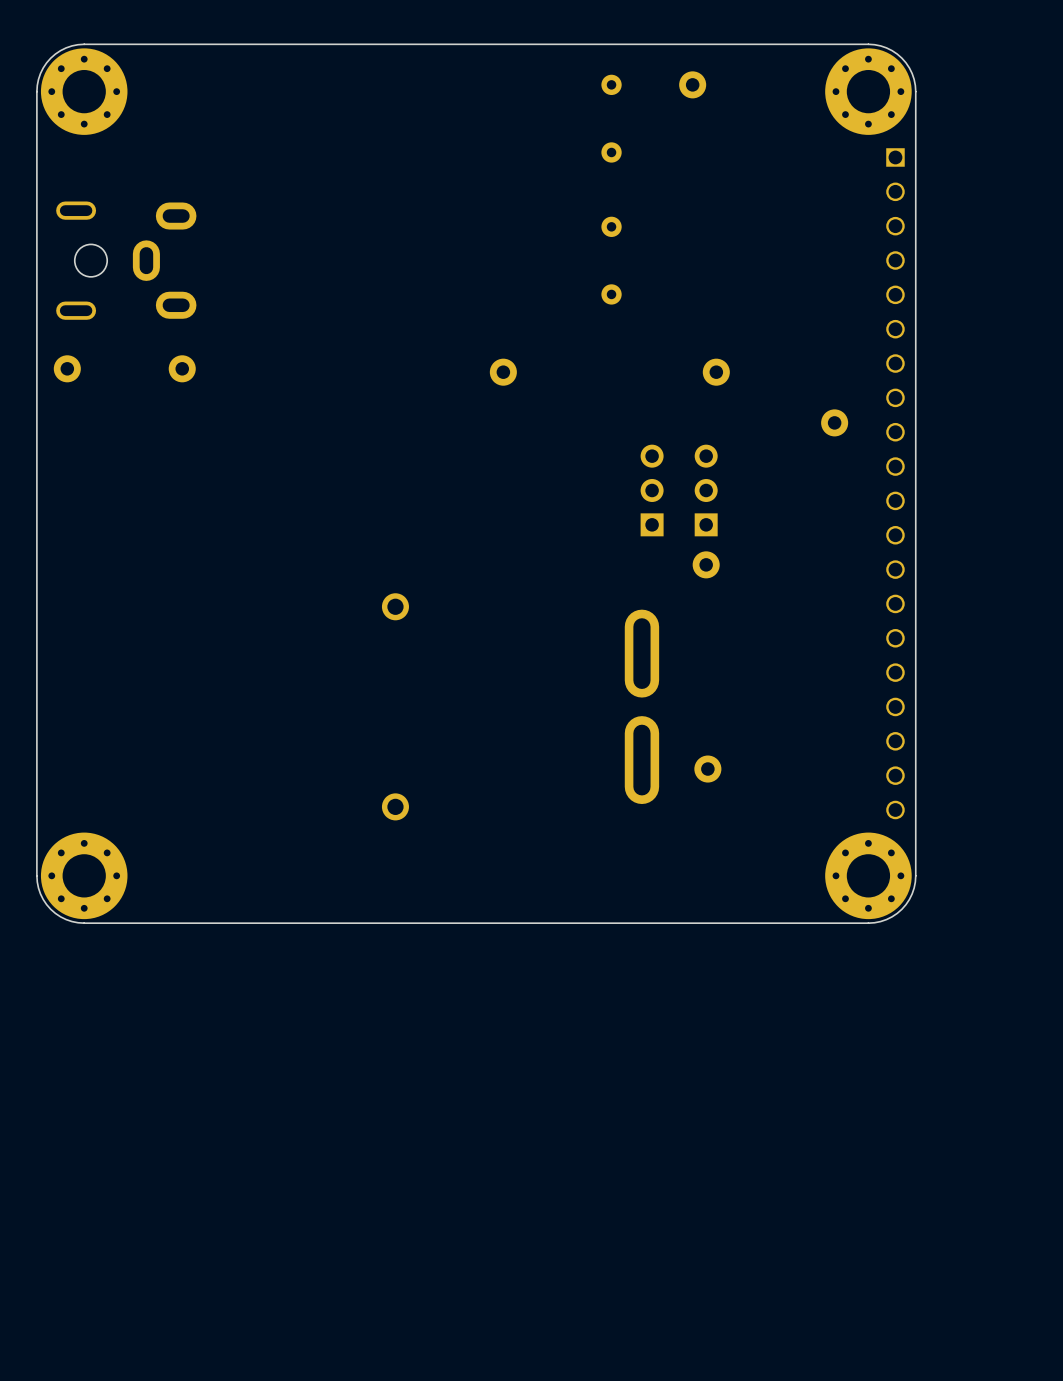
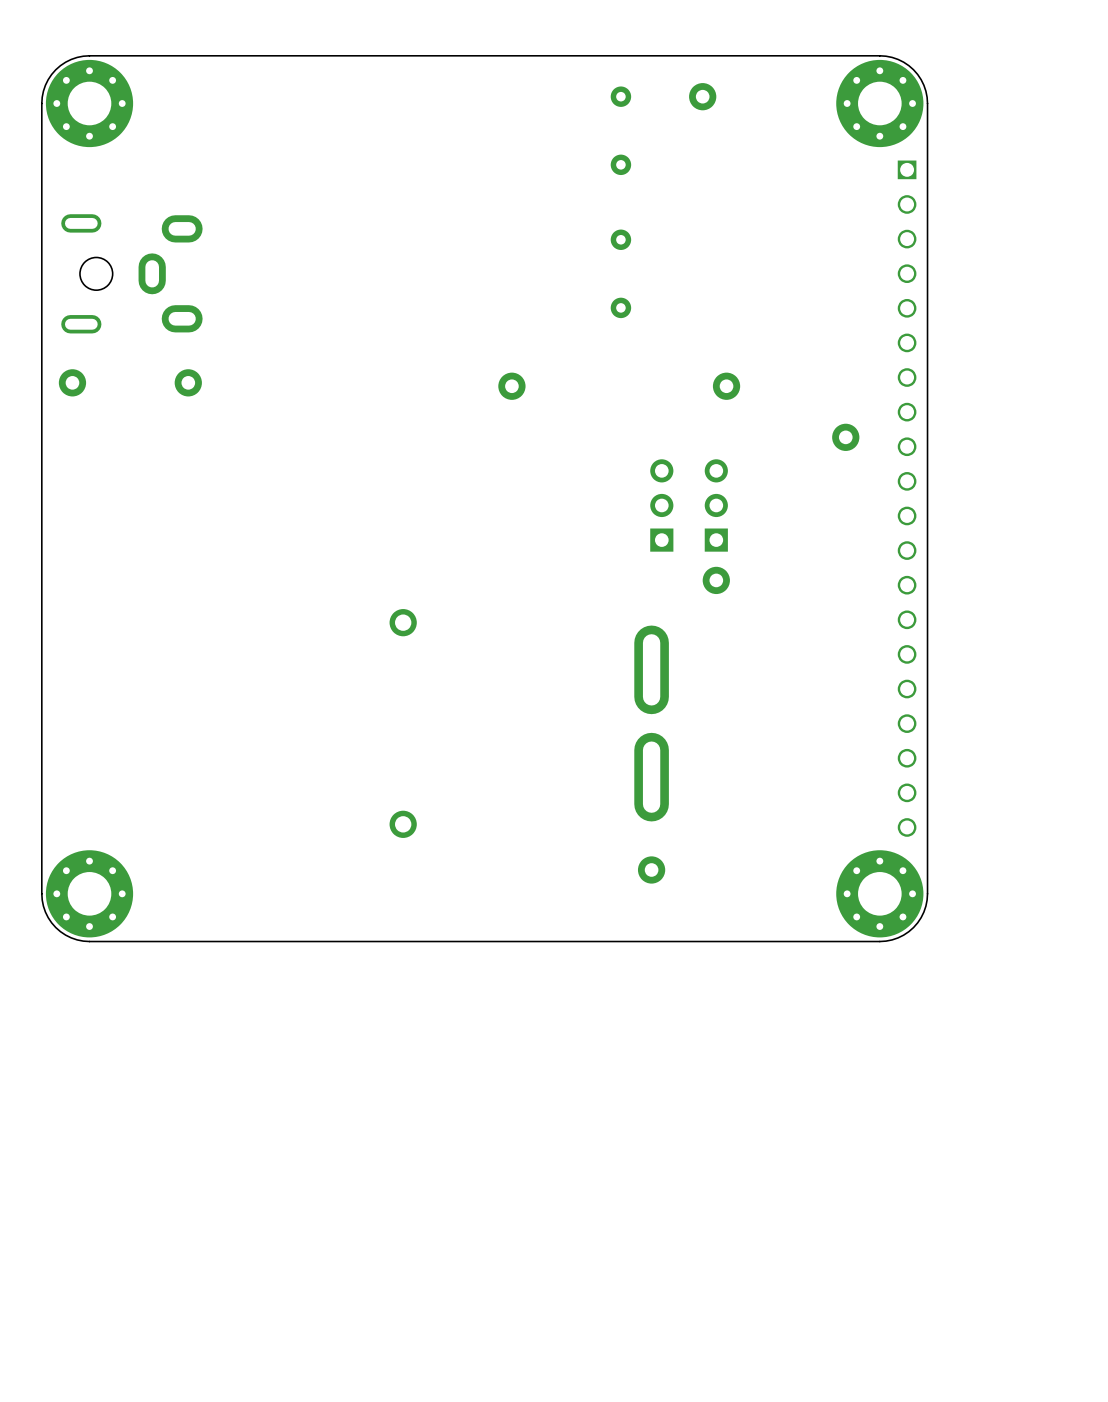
part position: (707, 769) -> (651, 869)

